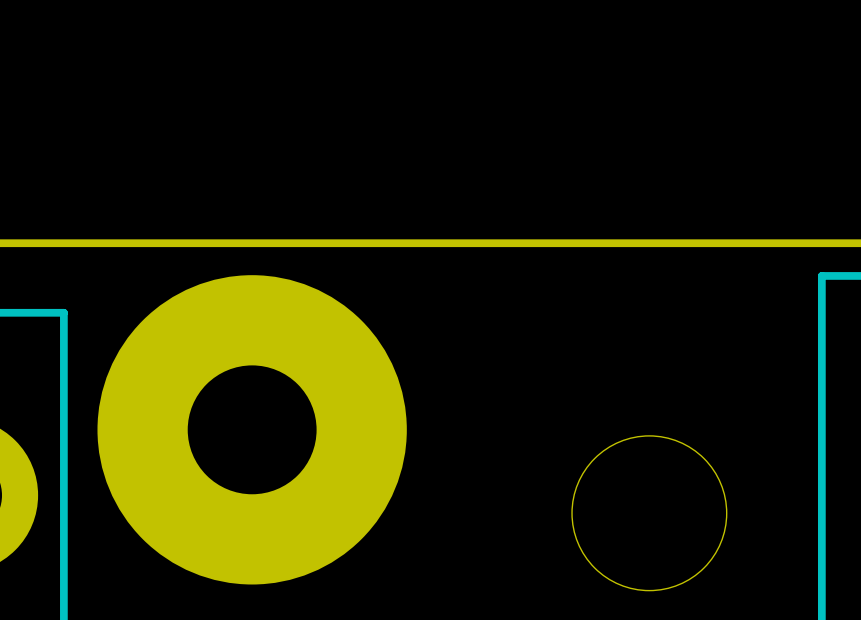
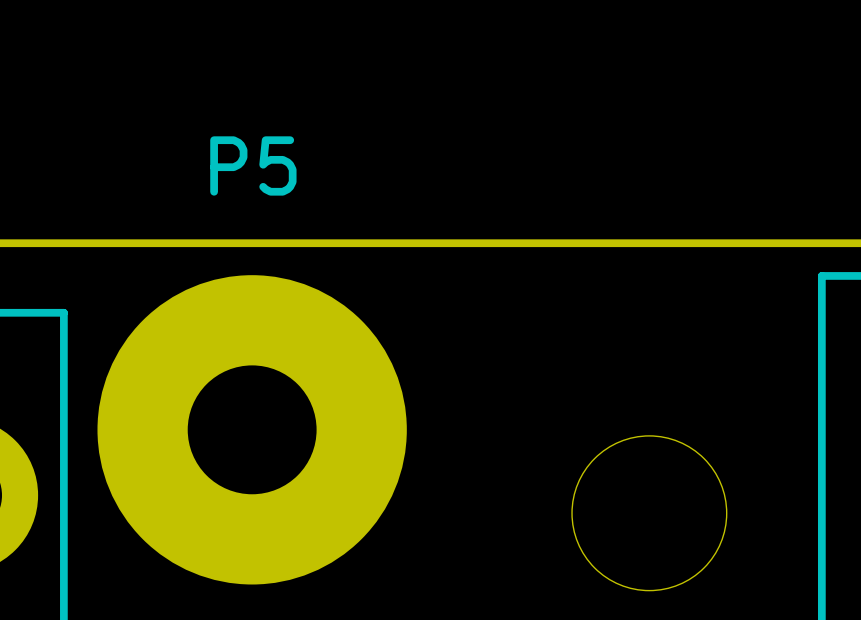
P5 name: none -> P5 (253, 165)

